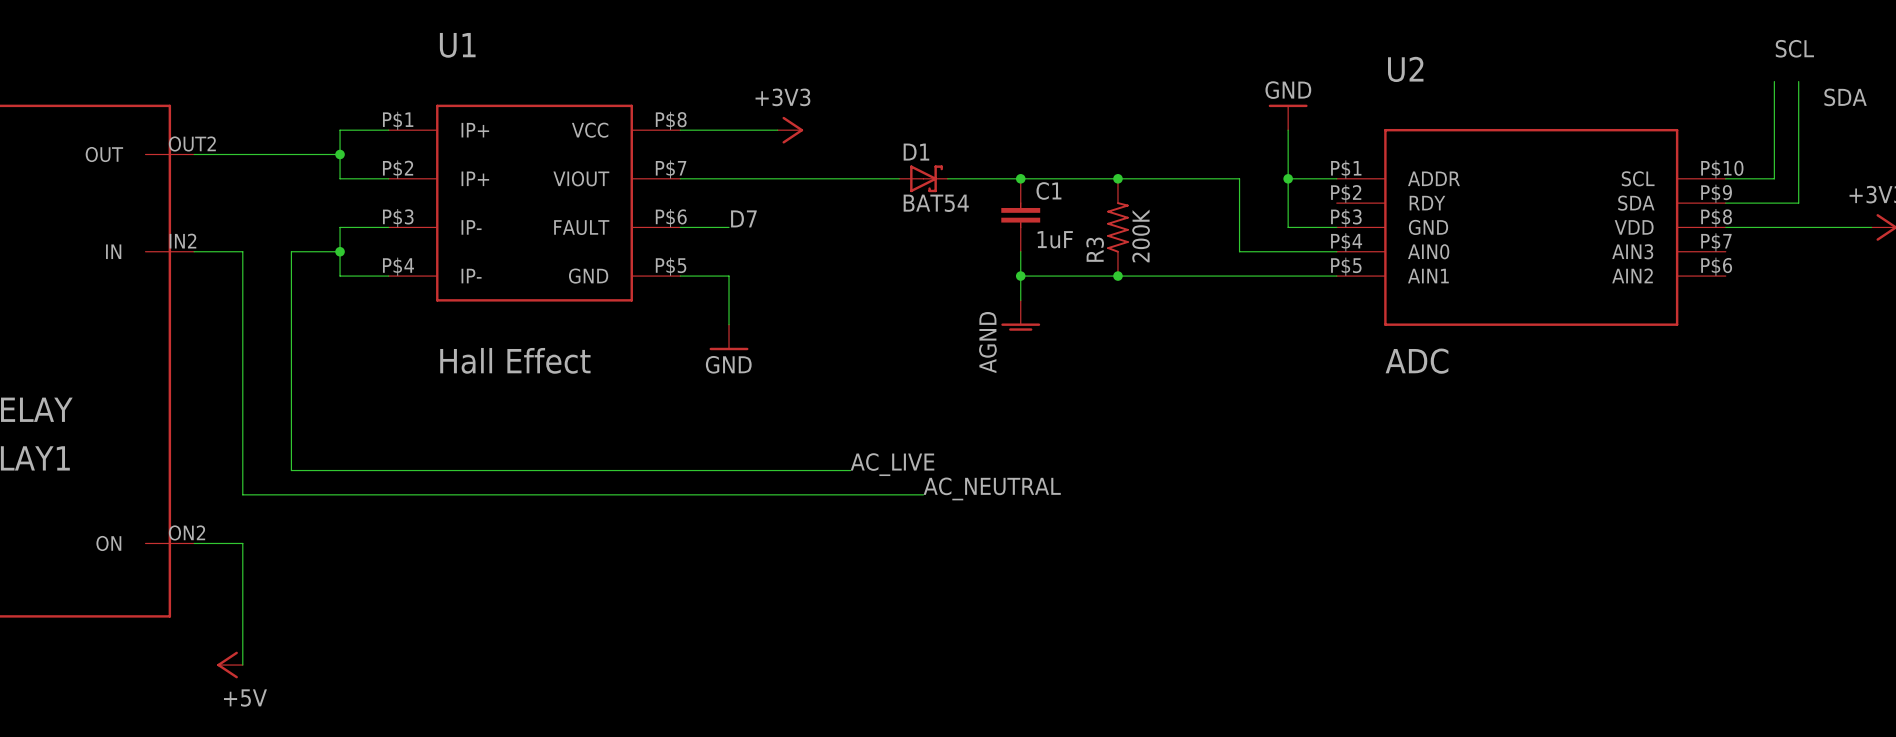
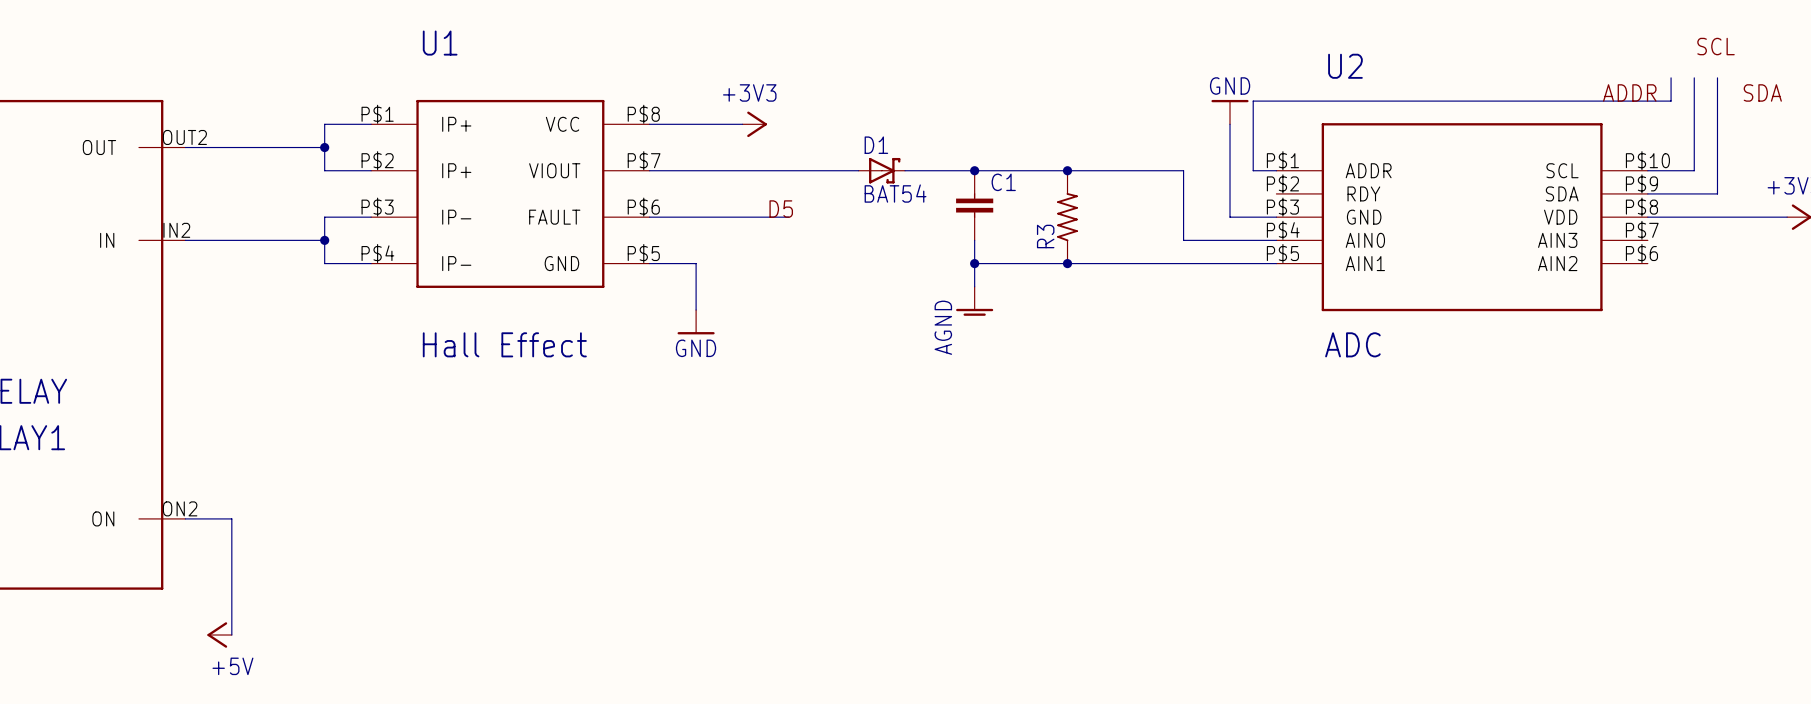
label: none -> ADDR (1629, 92)
wire: (1288, 178) (1312, 178) -> (1671, 77) (1671, 101) (1253, 101) (1253, 170)
junction: (1288, 178) -> none
label: D7 (743, 218) -> none
label: none -> D5 (781, 209)
wire: none -> (696, 217) (788, 217)
R3 value: 200K (1141, 235) -> none
C1 value: 1uF (1055, 239) -> none
wire: (242, 251) (242, 494) (923, 494) -> none
wire: (291, 251) (291, 470) (850, 470) -> (278, 240) (231, 240)
label: AC_LIVE (892, 464) -> none
label: AC_NEUTRAL (992, 488) -> none

